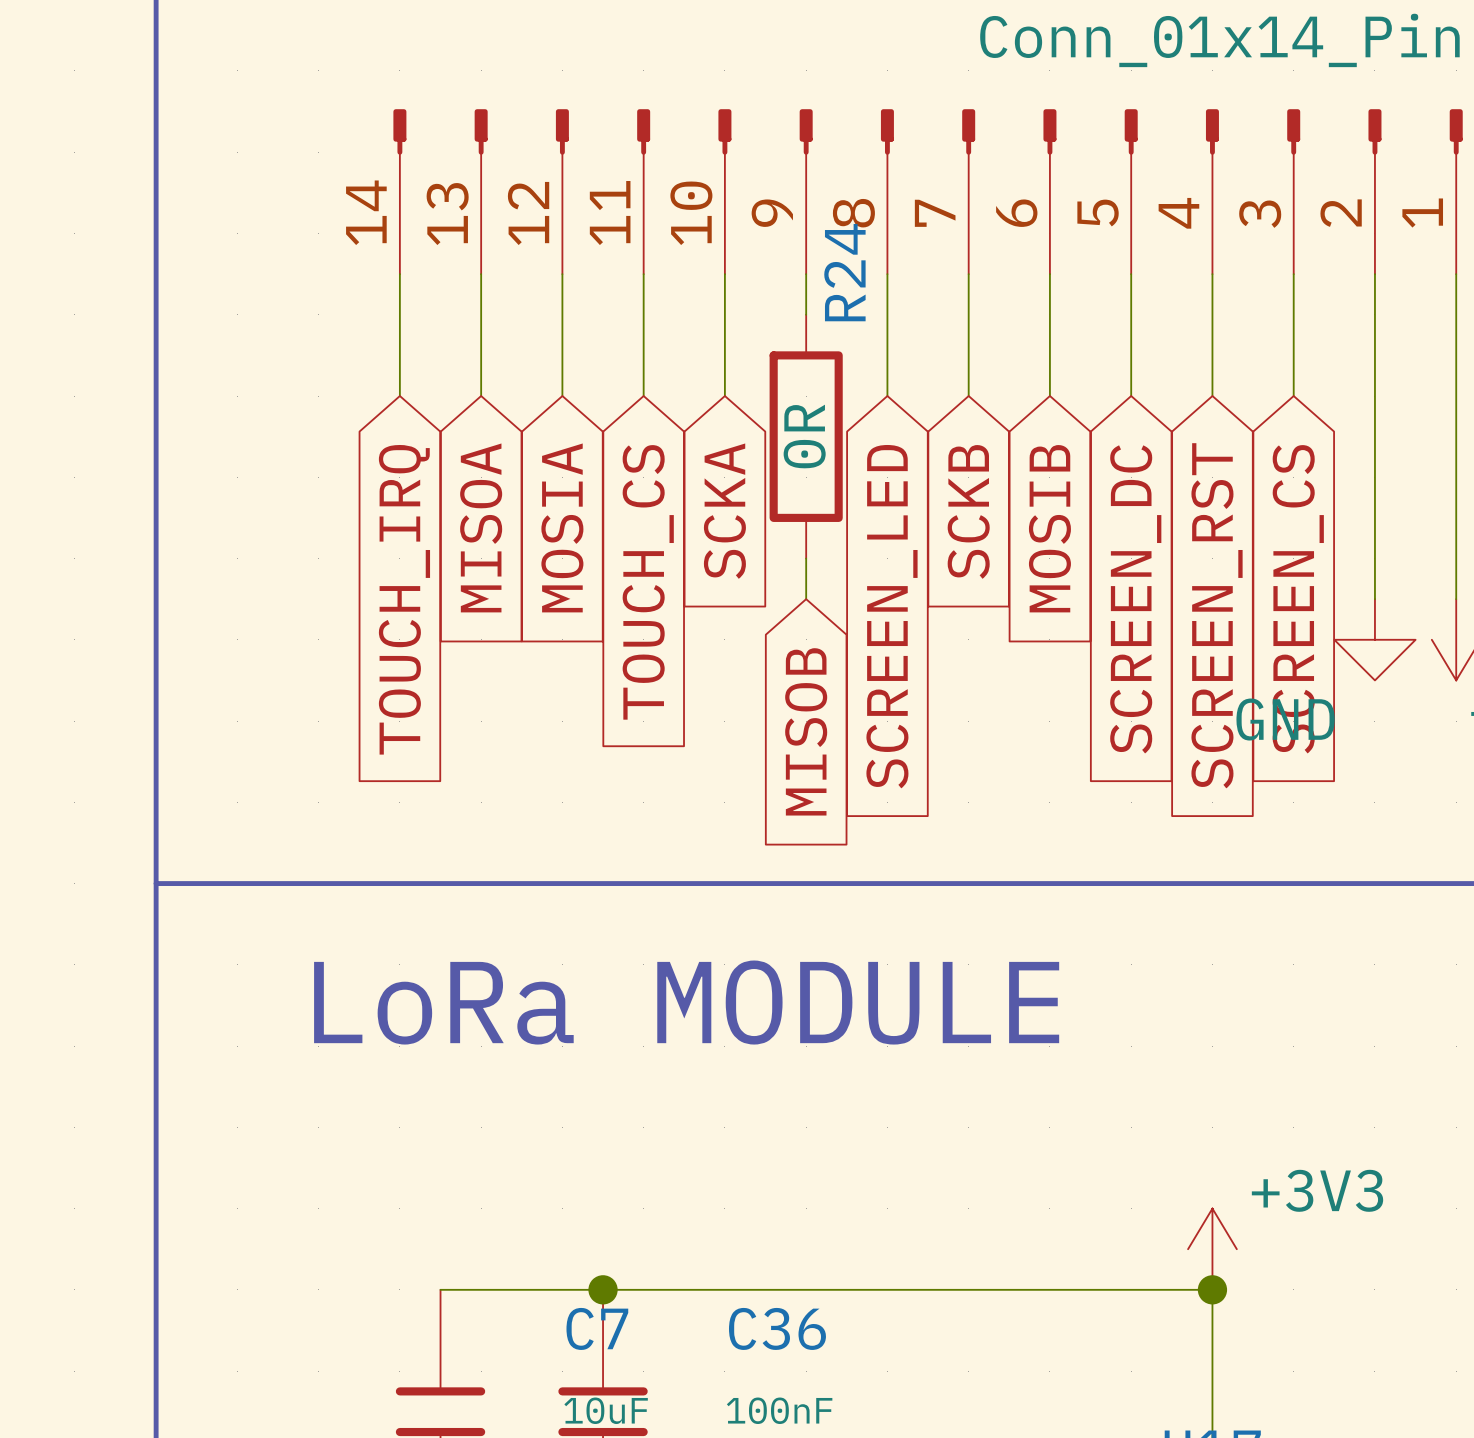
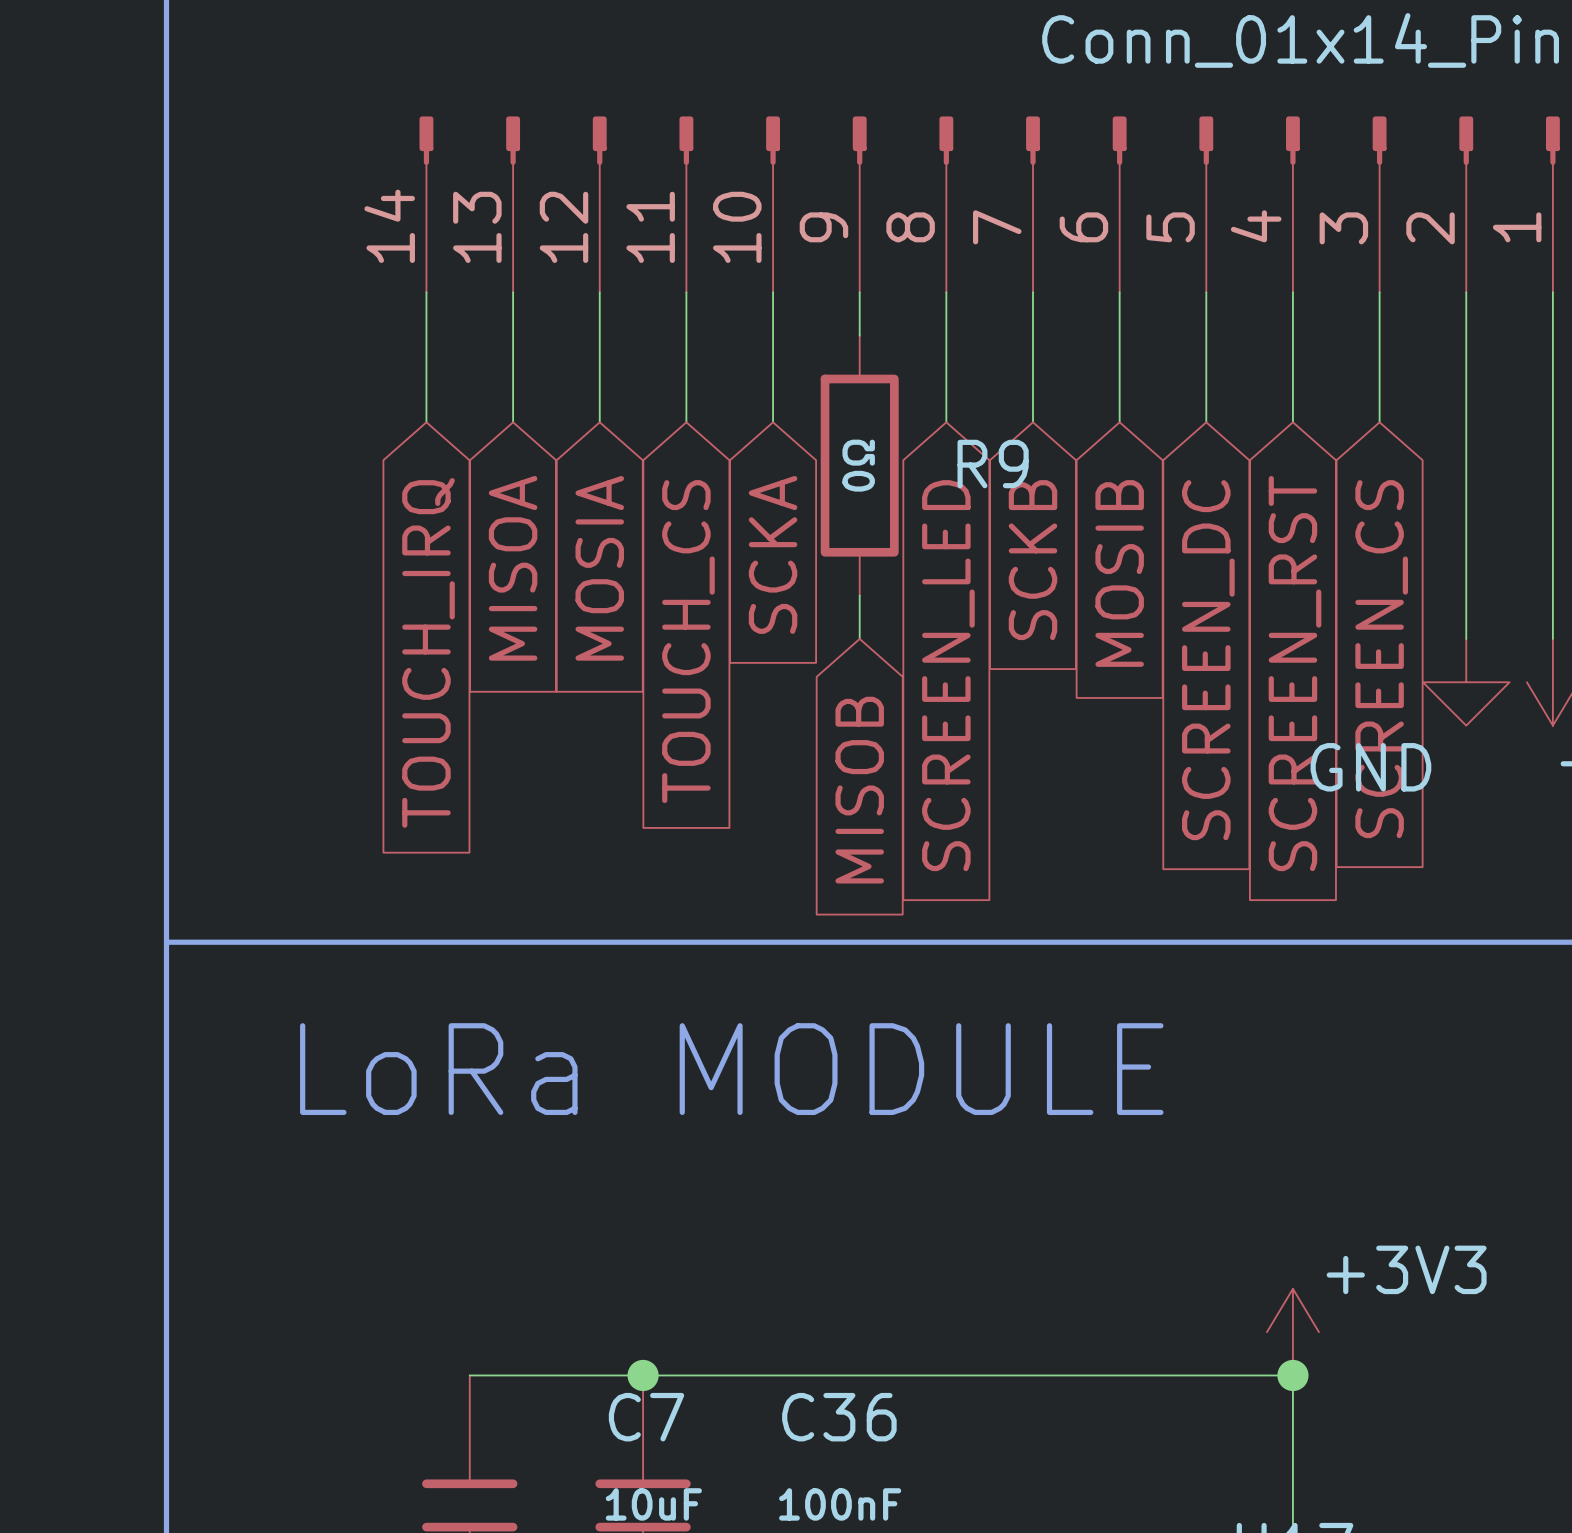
R24 name: R24 (844, 272) -> R9 (993, 464)
R24 value: 0R (804, 436) -> 0Ω (858, 465)

